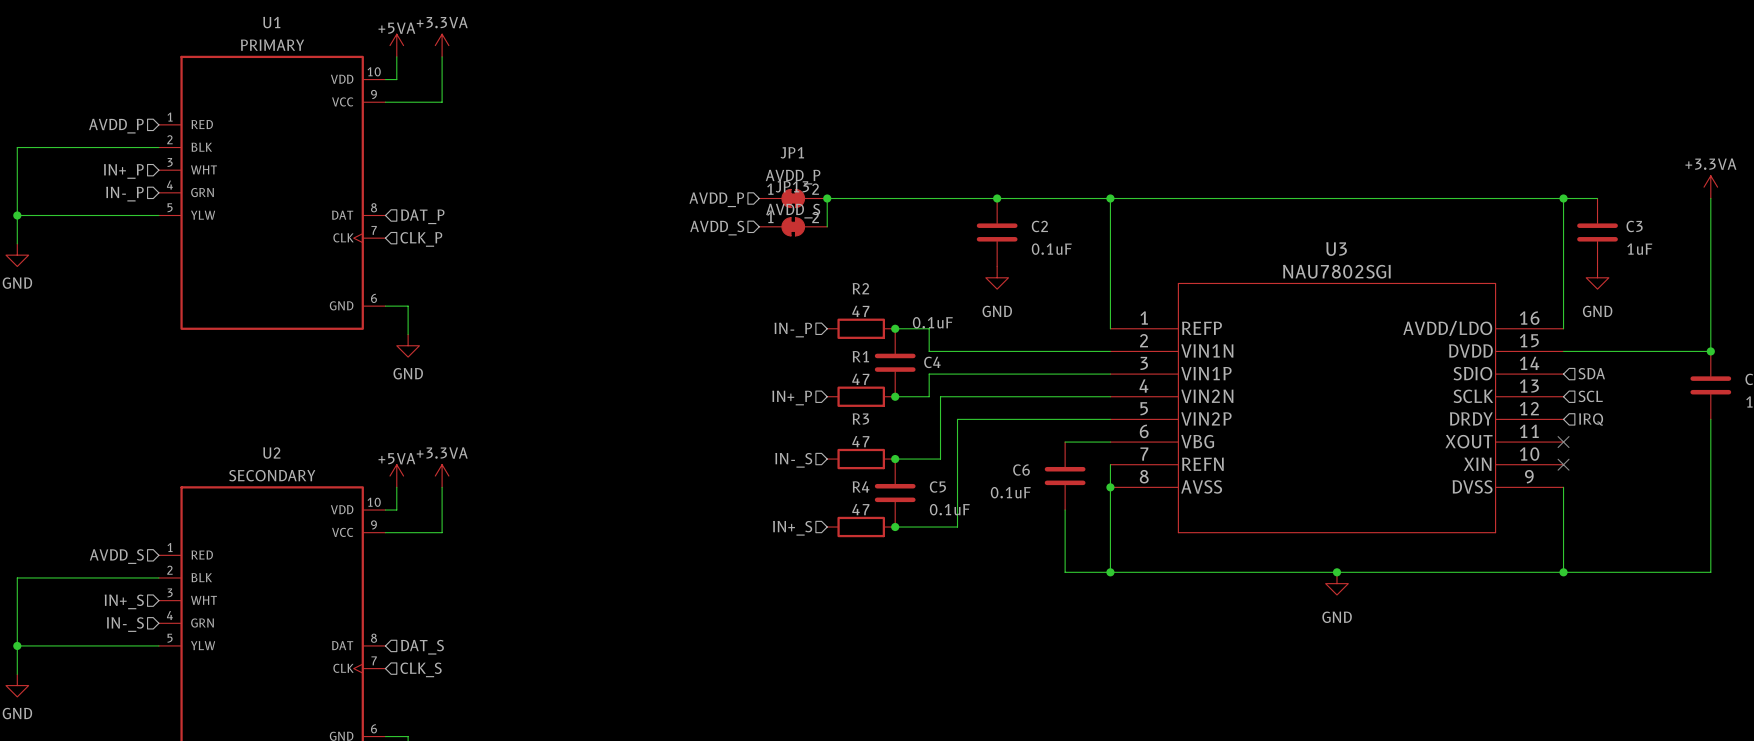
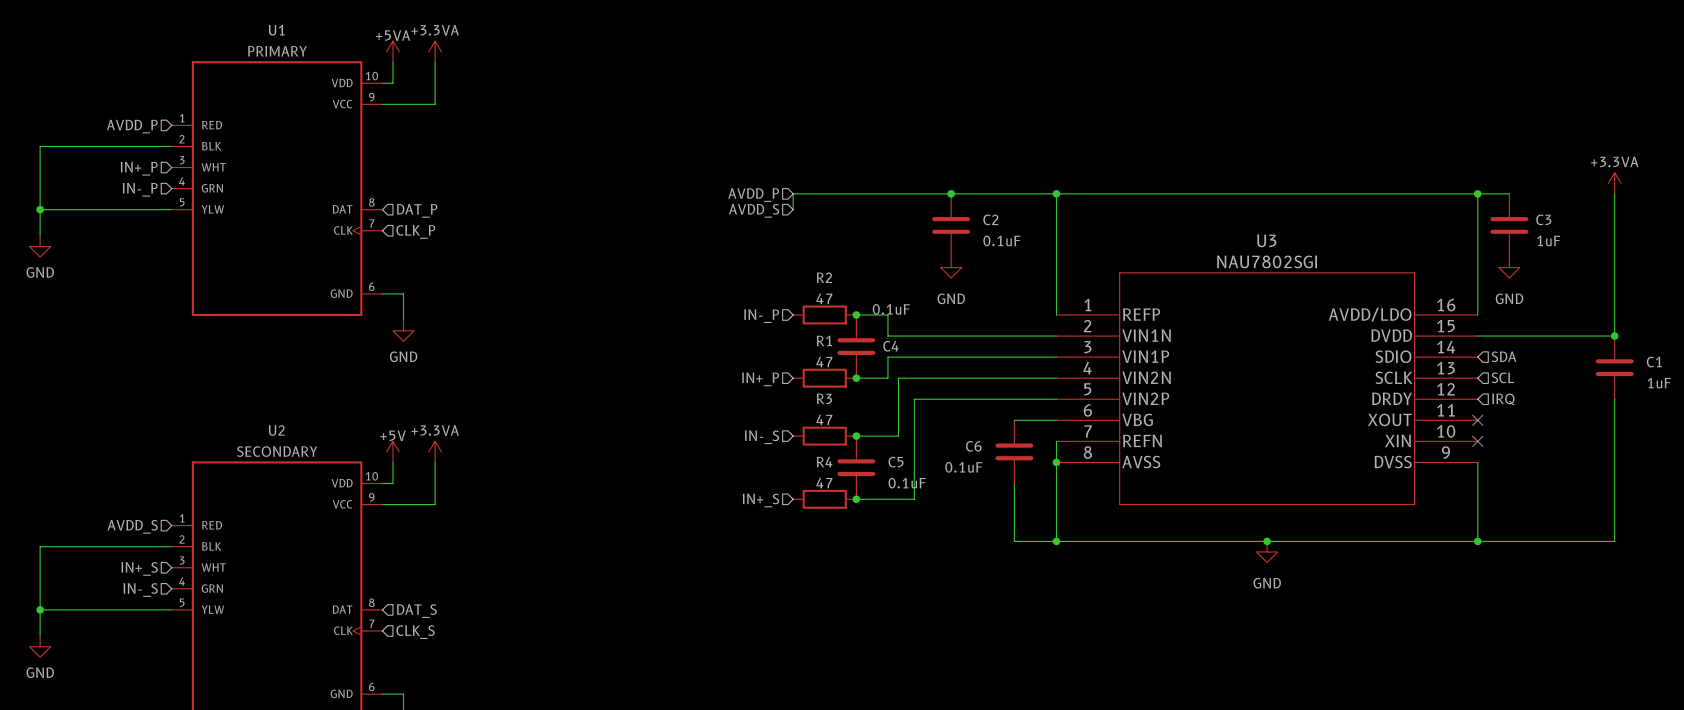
JP1: AVDD_P (793, 198) -> none
junction: (827, 198) -> none
hierarchical label position: AVDD_P (716, 199) -> AVDD_P (753, 195)
wire: (827, 215) (827, 226) -> none
JP13: AVDD_S (793, 226) -> none
hierarchical label position: AVDD_S (717, 228) -> AVDD_S (754, 210)
power symbol: +5VA (396, 476) -> +5V (392, 451)

